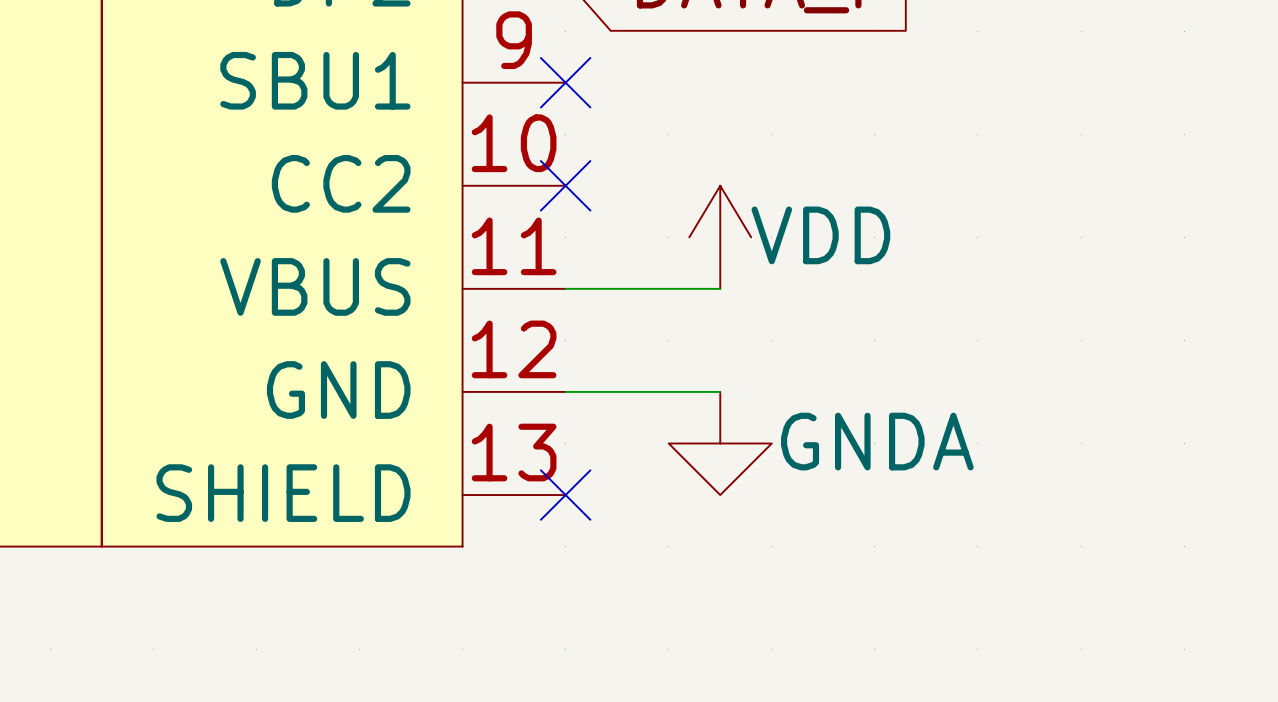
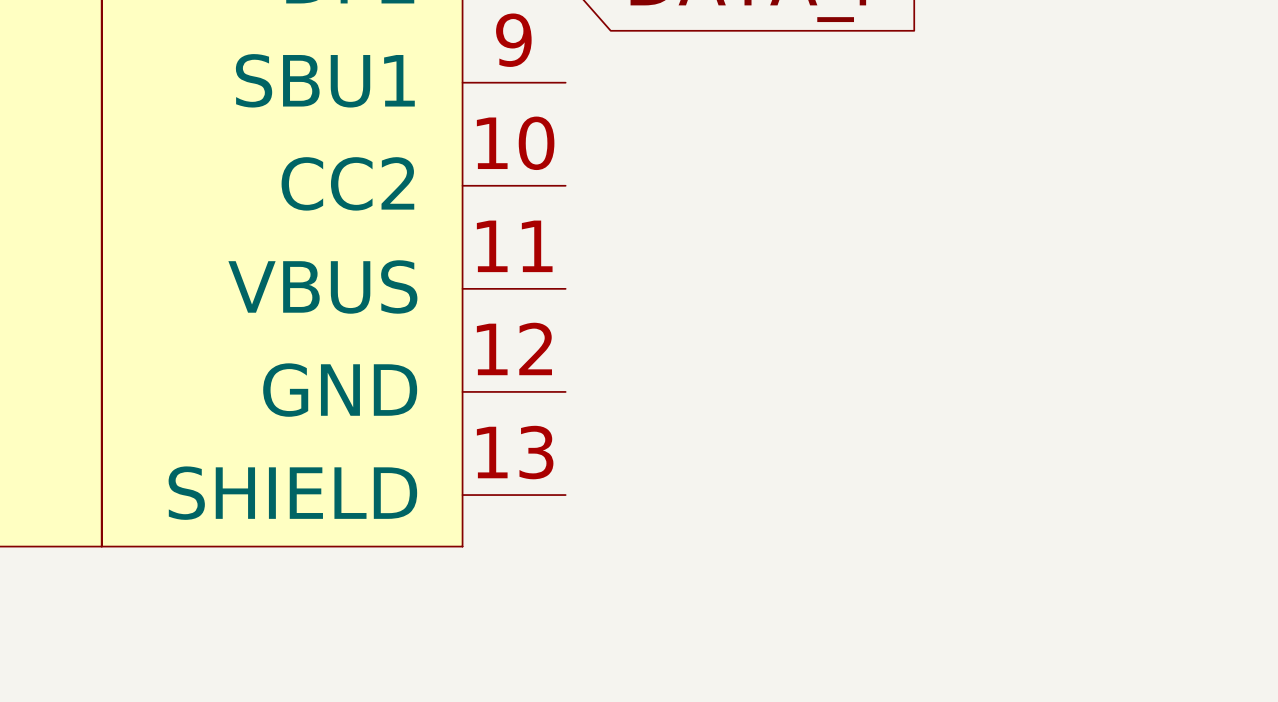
no-connect mark: (565, 82) -> none
no-connect mark: (565, 185) -> none
power symbol: VDD (720, 237) -> none
wire: (565, 288) (720, 288) -> none
wire: (565, 391) (720, 391) -> none
power symbol: GNDA (720, 443) -> none
no-connect mark: (565, 495) -> none

